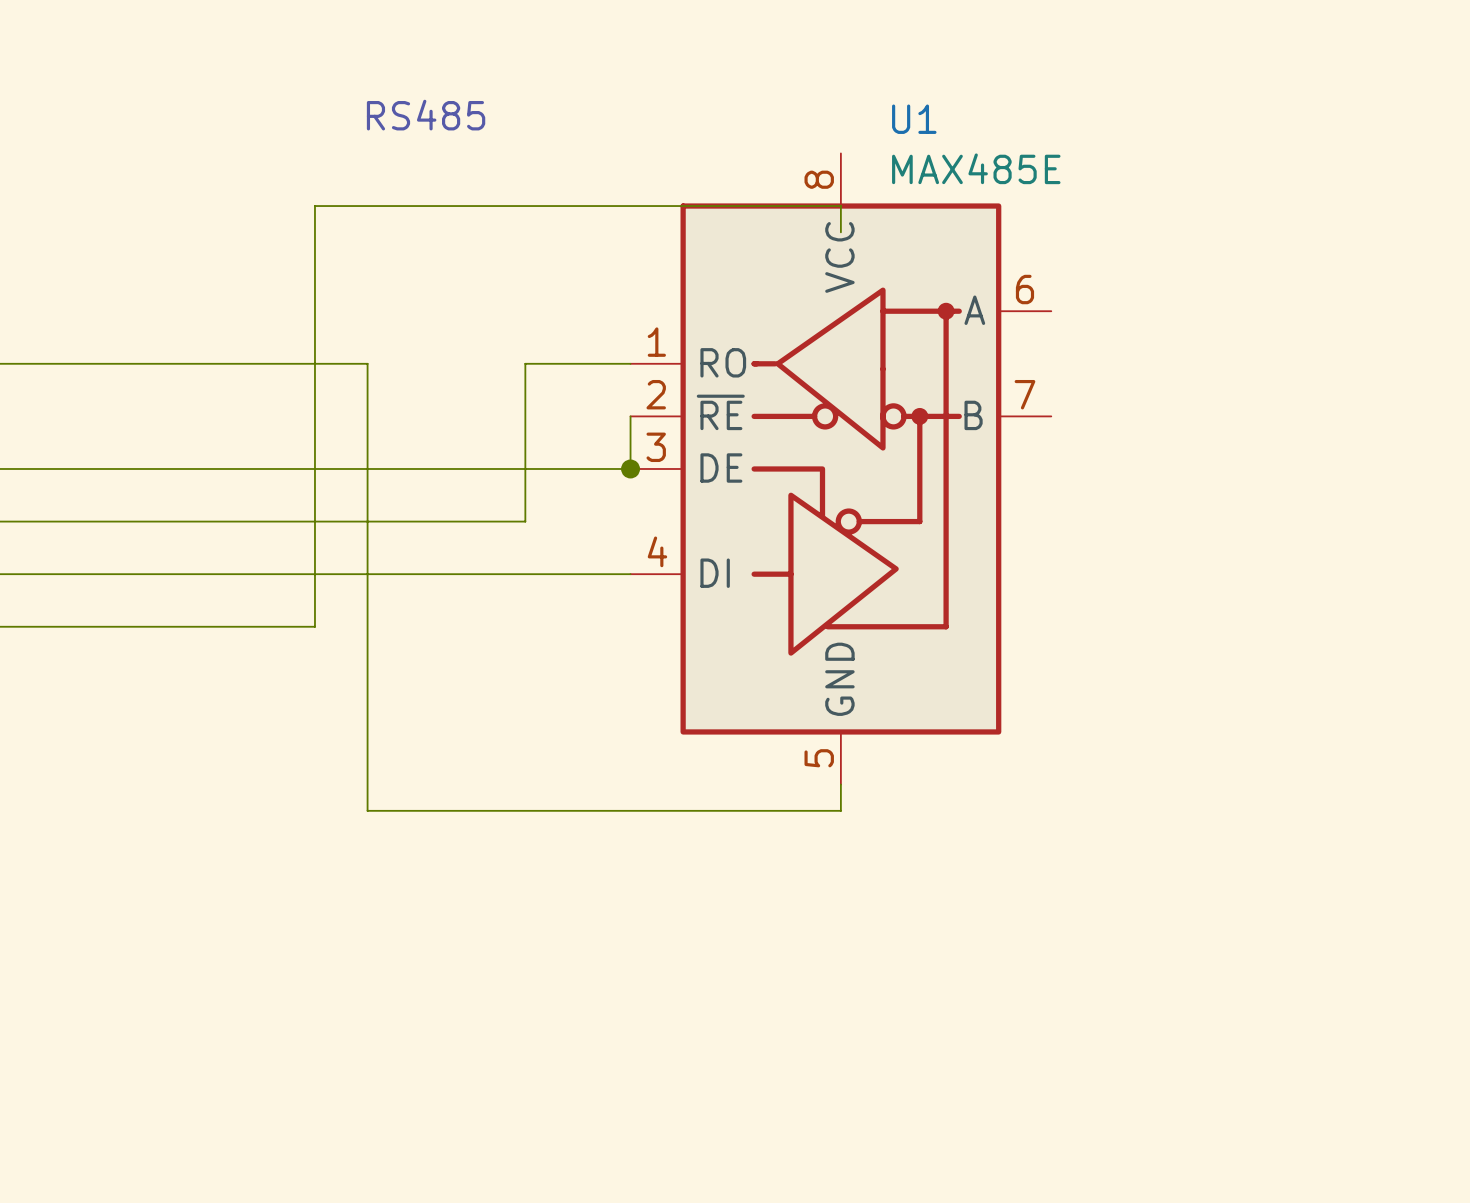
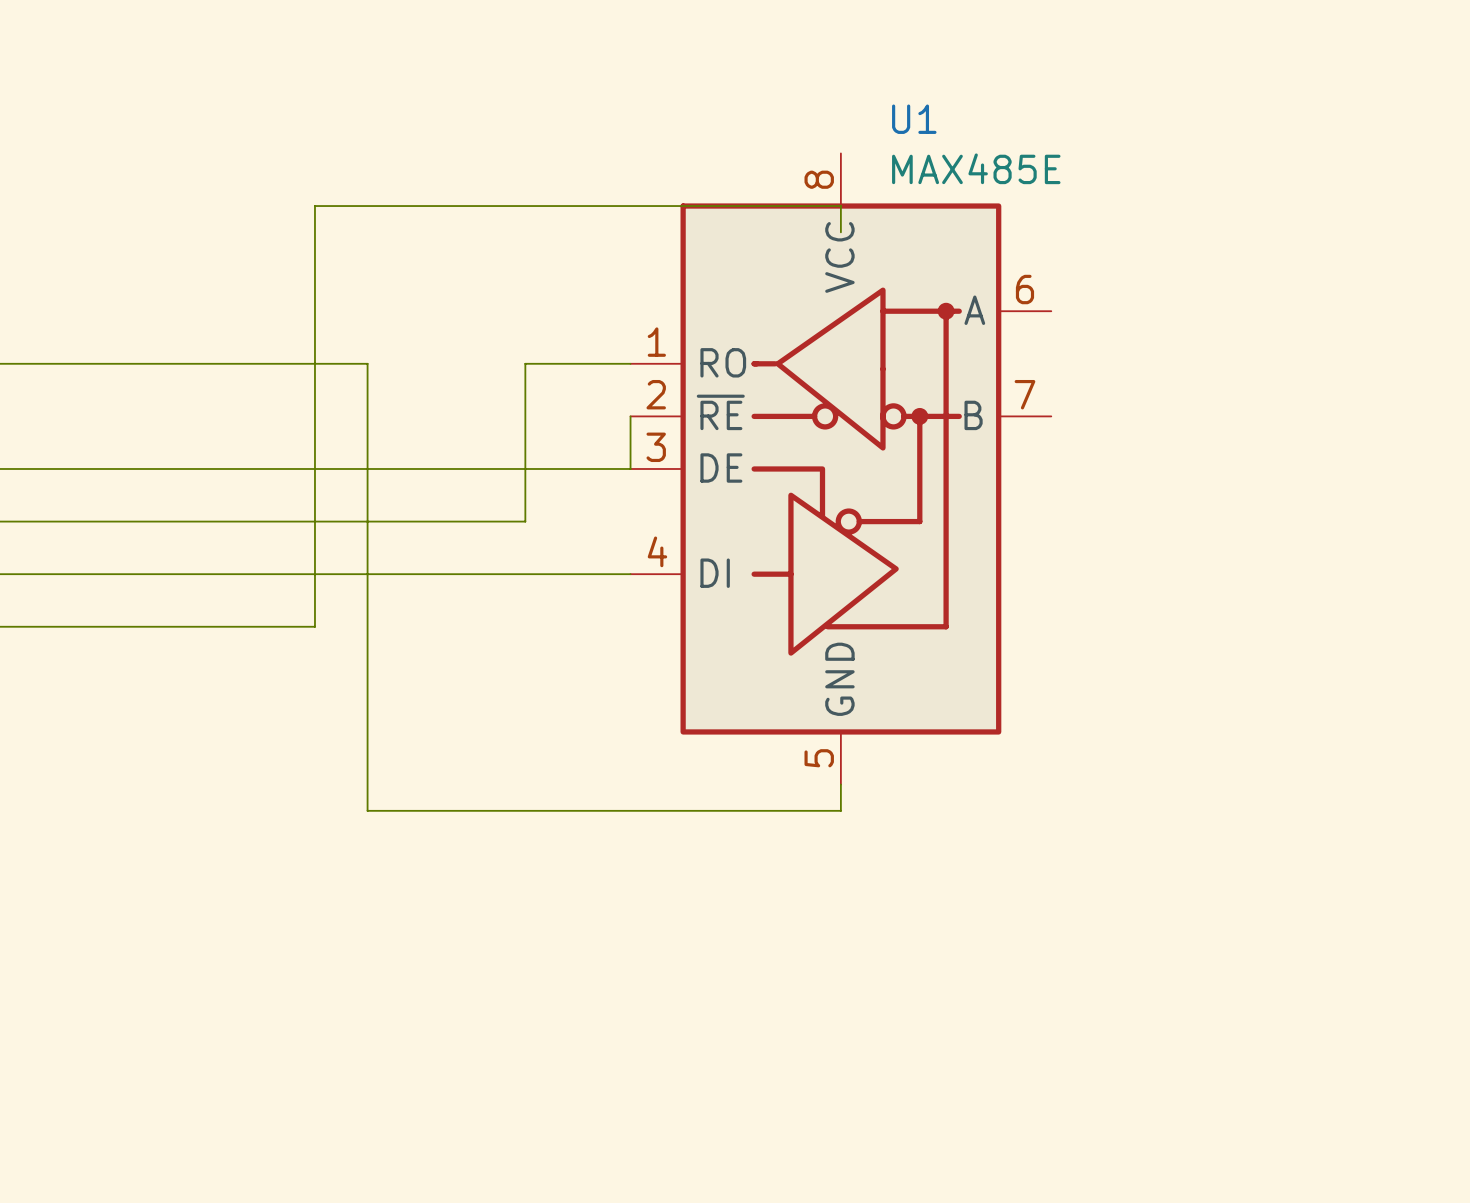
text: RS485 (426, 115) -> none
junction: (630, 468) -> none

